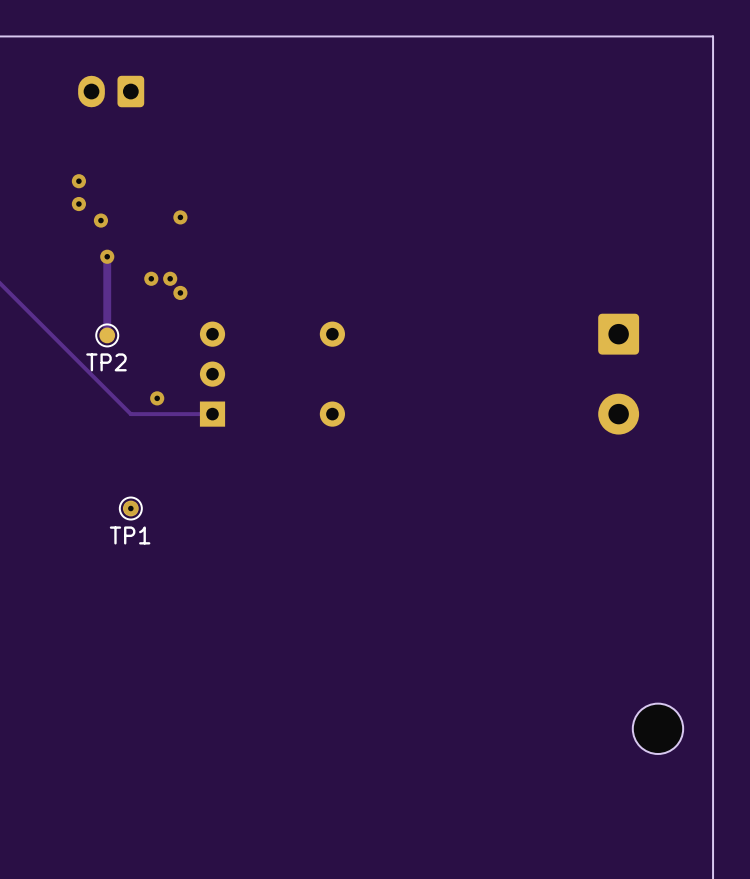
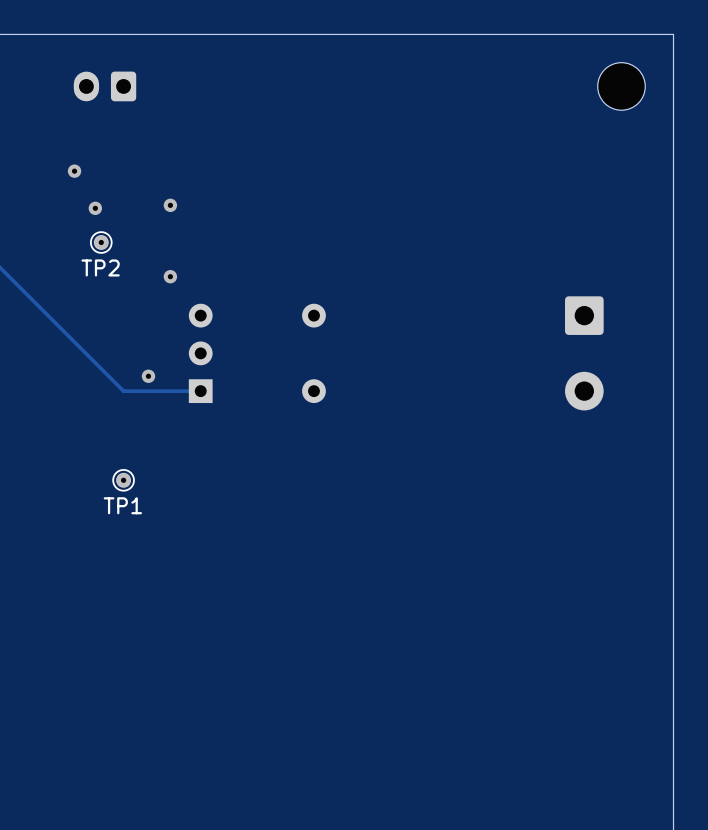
part: none -> (621, 86)
via: (78, 204) -> none
track: (107, 256) (107, 335) -> none
via: (151, 278) -> none
via: (170, 278) -> none
TP2 position: (107, 335) -> (101, 242)
part: (657, 728) -> none

